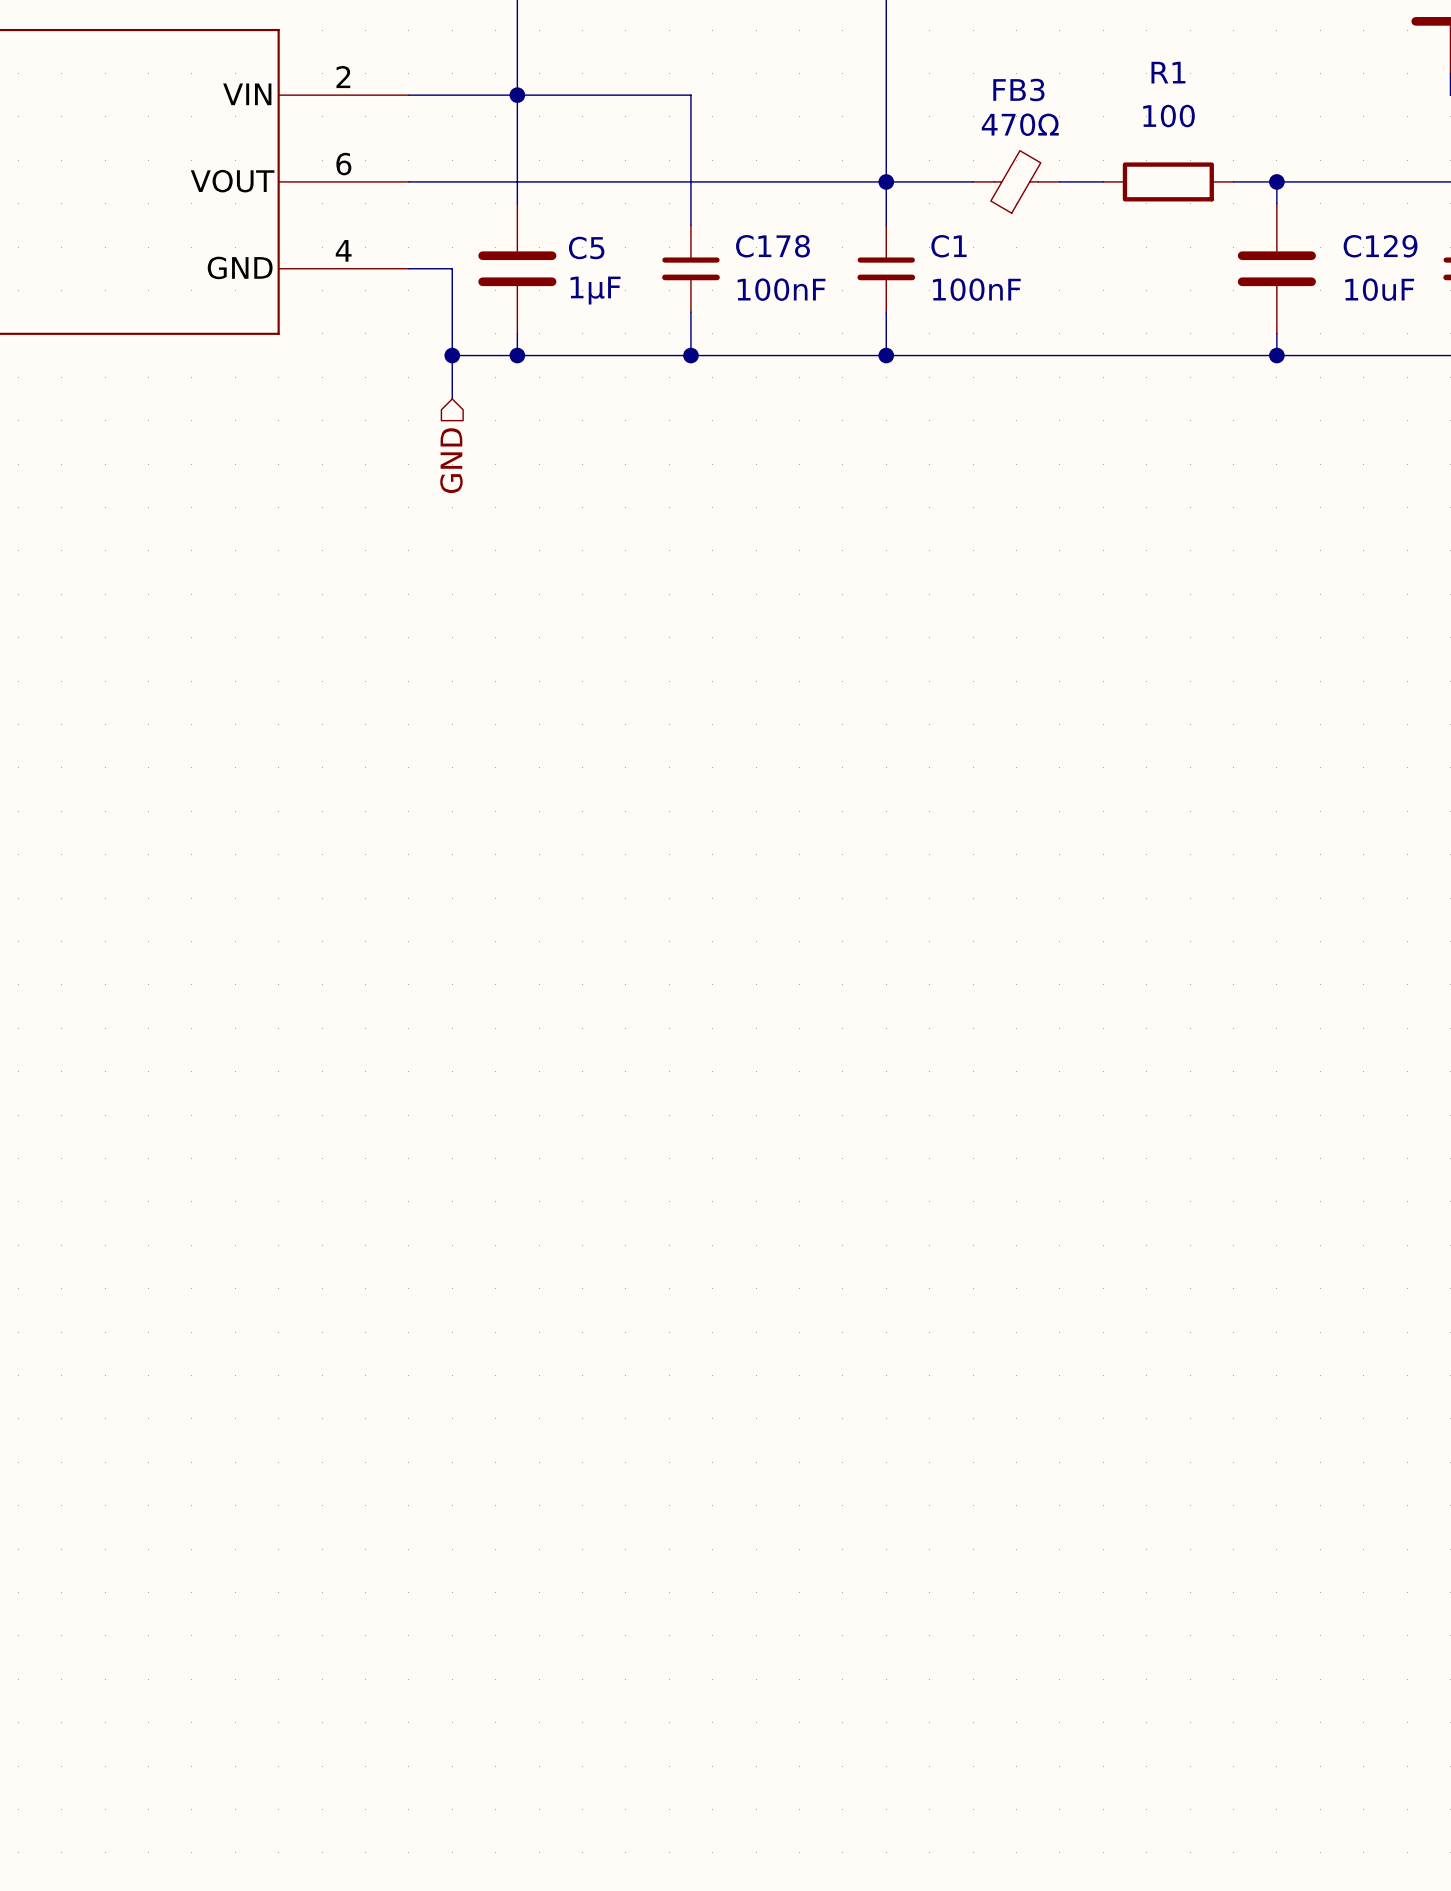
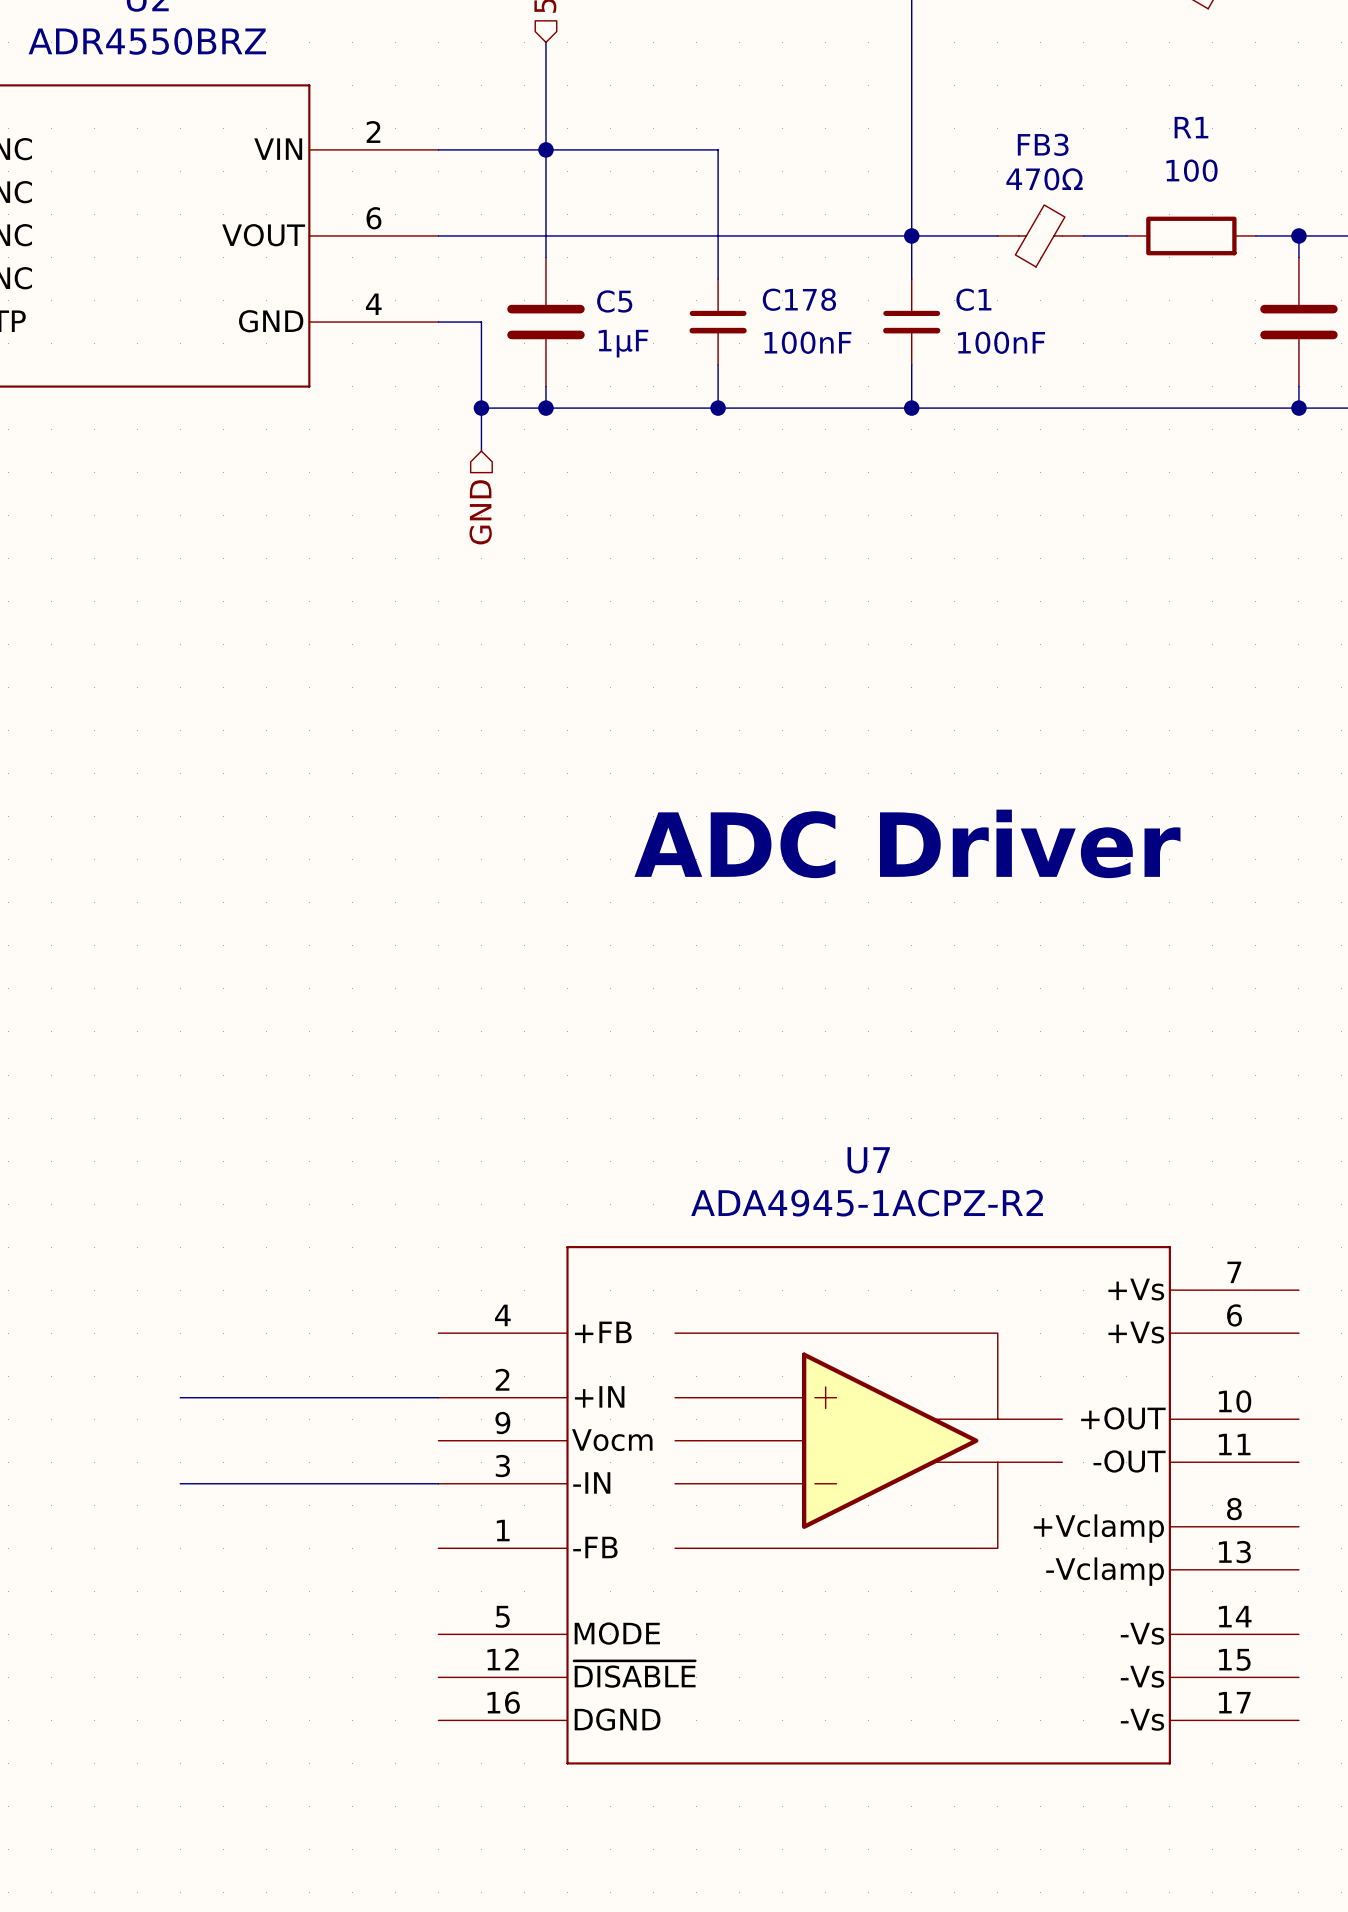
text: none -> ADC Driver (907, 843)
wire: none -> (180, 1397) (438, 1397)
wire: none -> (180, 1483) (438, 1483)
U7: none -> ADA4945-1ACPZ-R2 (868, 1505)

